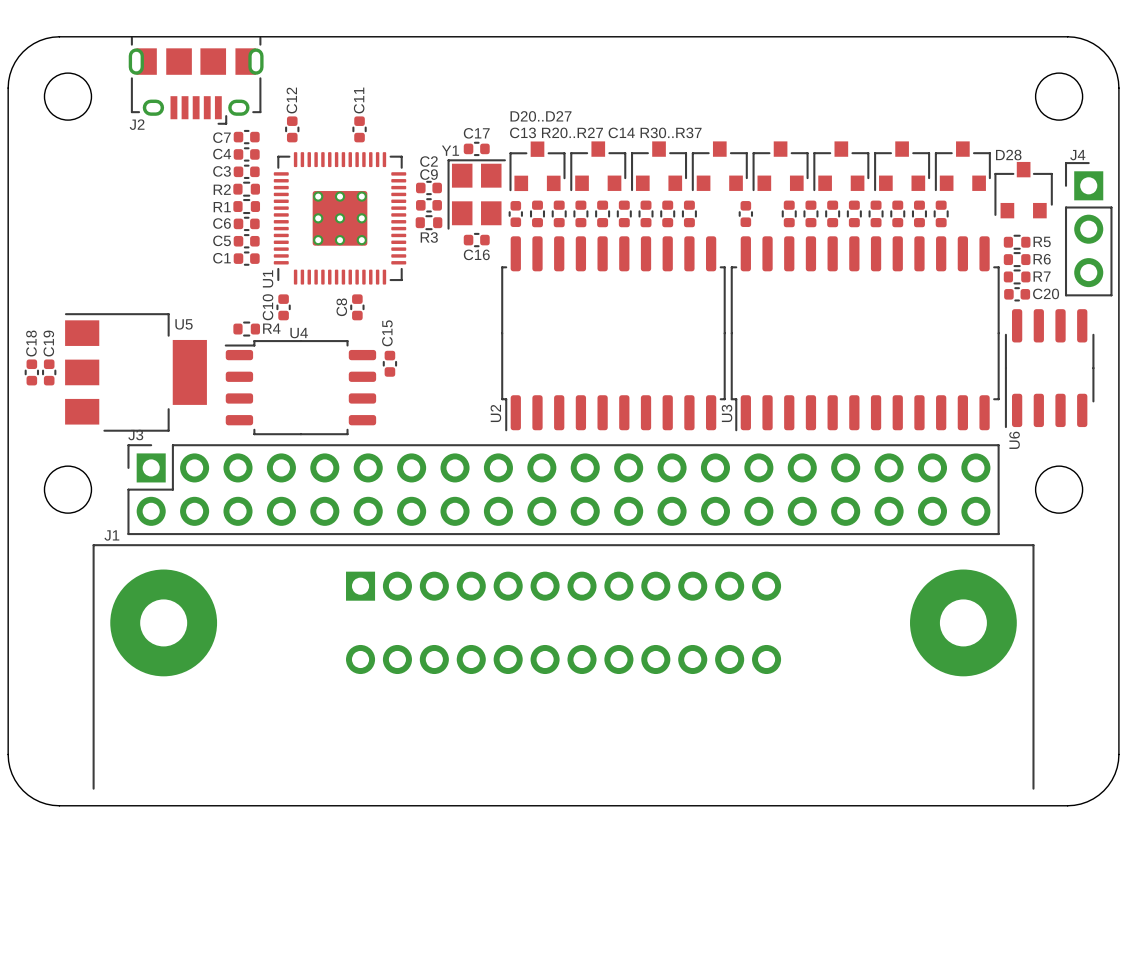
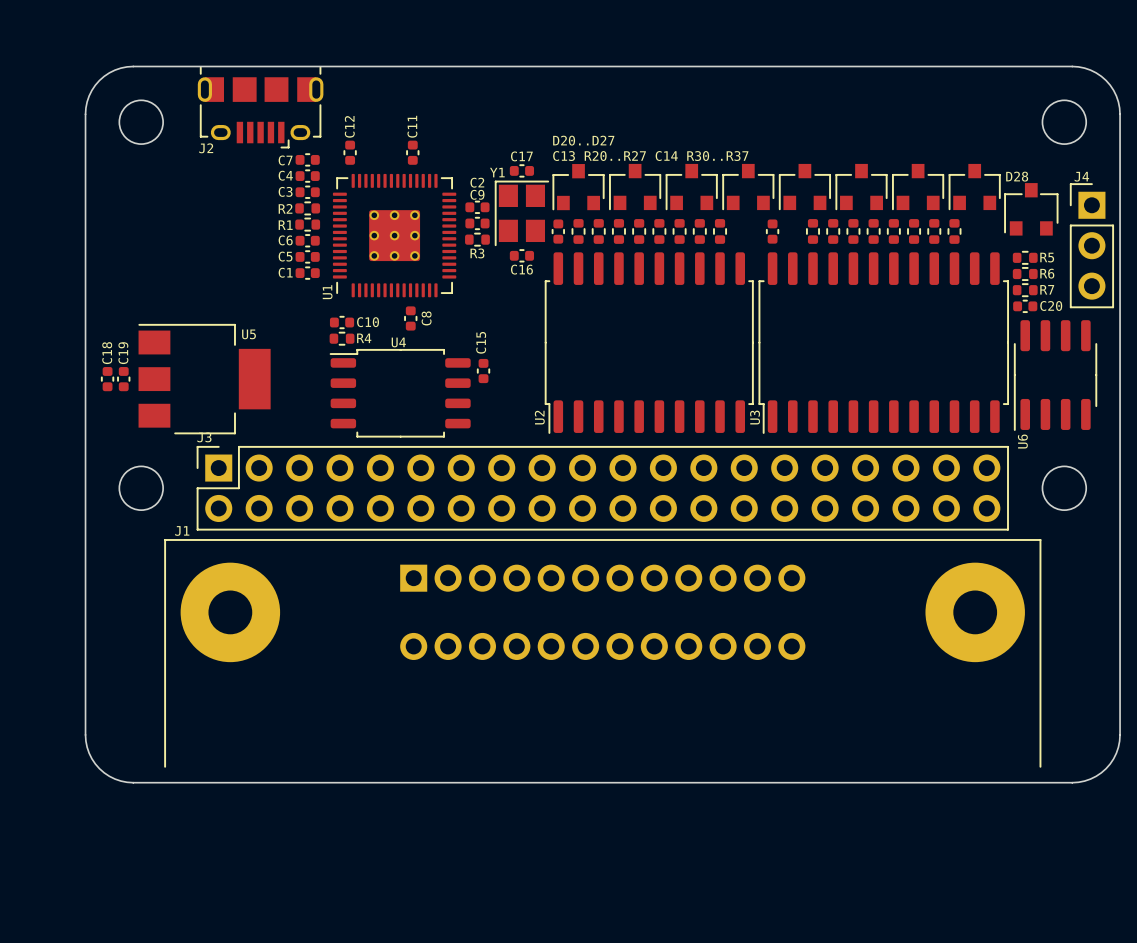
C10 name position: C10 (268, 307) -> C10 (368, 322)
C10 rotation: 0° (283, 307) -> 90° clockwise (342, 322)
C8 name position: C8 (341, 307) -> C8 (426, 318)
R4 position: (246, 329) -> (342, 338)
C15 position: (389, 363) -> (483, 371)
U4 position: (300, 387) -> (400, 393)

